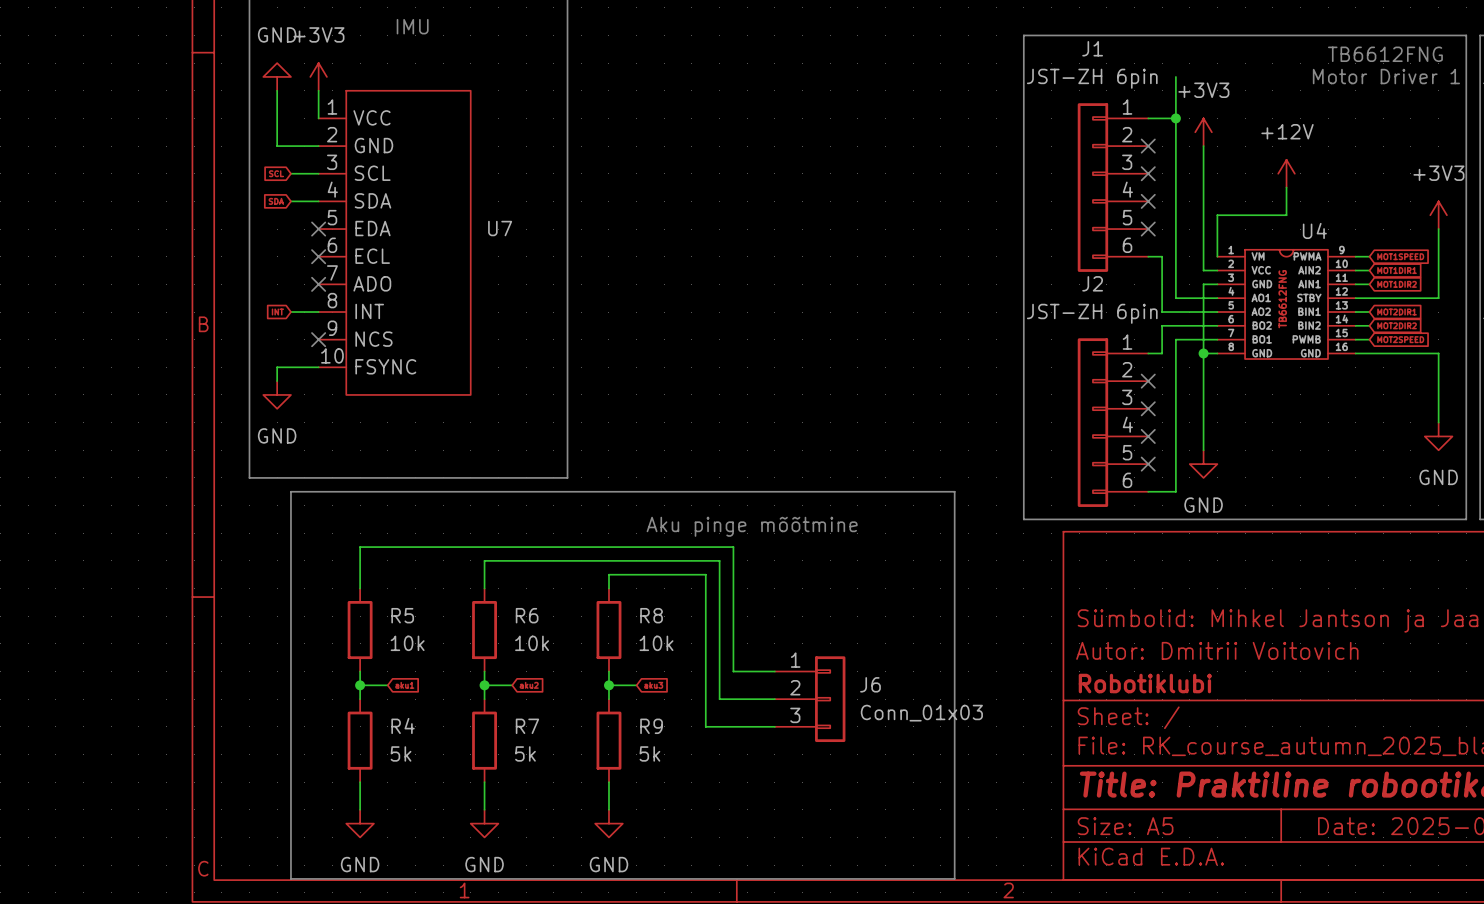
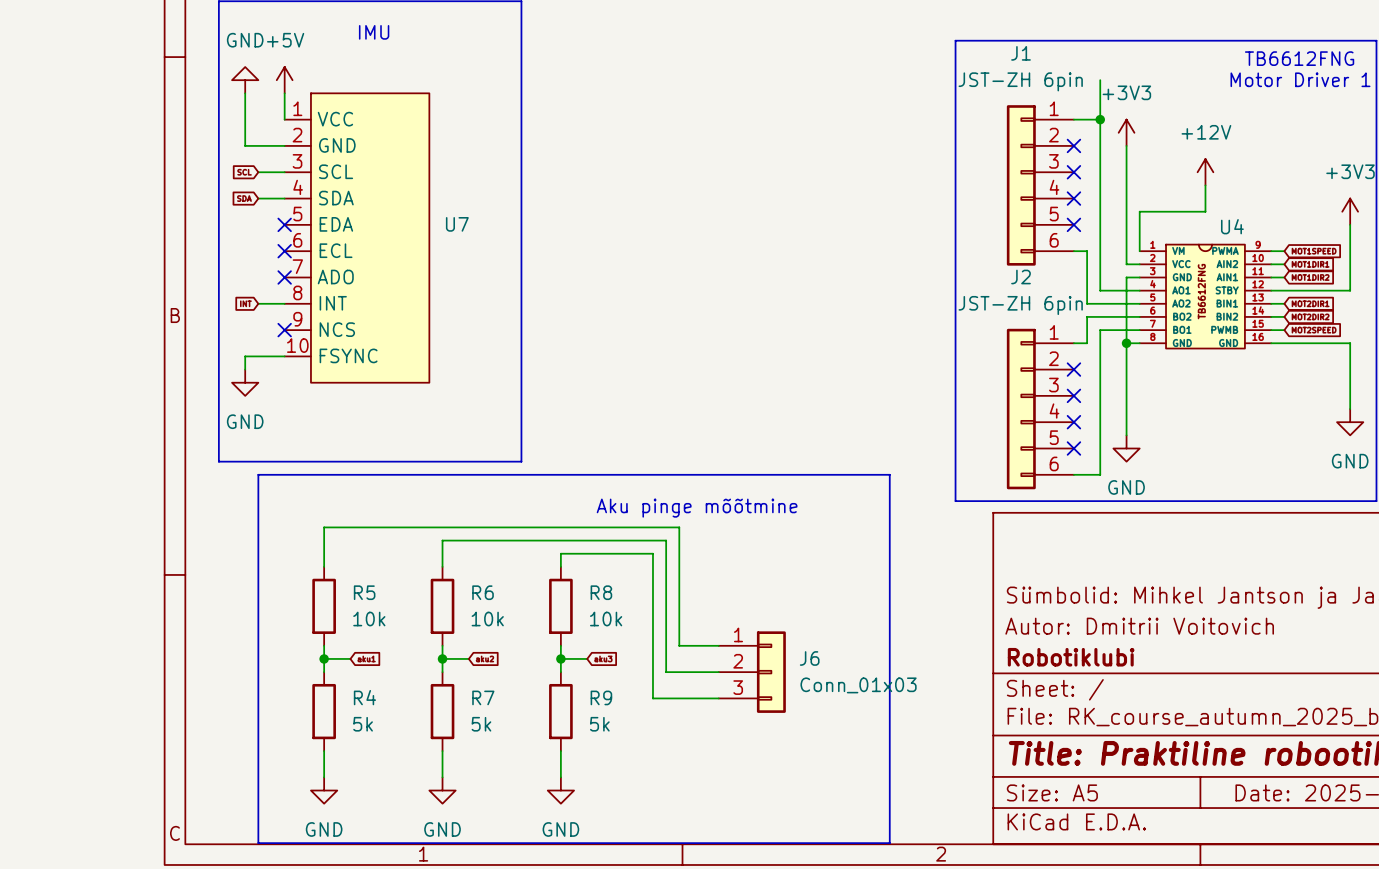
power symbol: +3V3 (318, 76) -> +5V (284, 80)

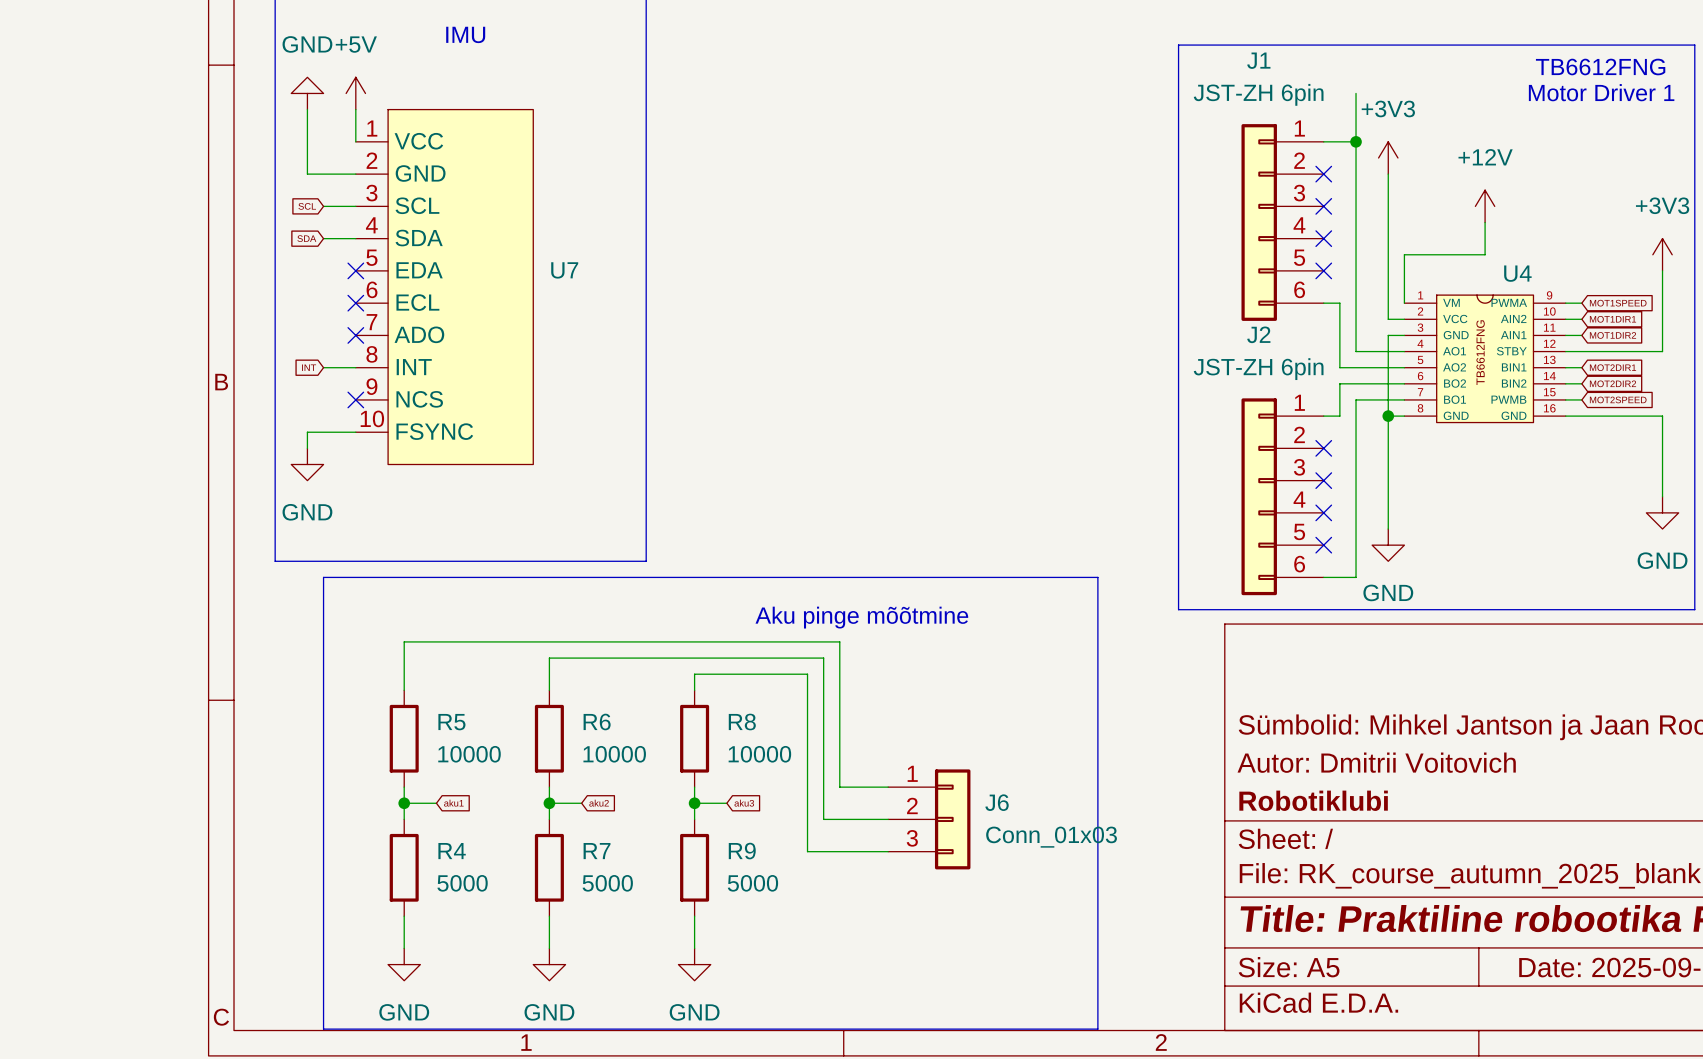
R5 value: 10k (369, 619) -> 10000 (469, 754)
R6 value: 10k (487, 619) -> 10000 (614, 754)
R8 value: 10k (606, 619) -> 10000 (759, 754)
R4 value: 5k (363, 724) -> 5000 (462, 883)
R7 value: 5k (481, 724) -> 5000 (607, 883)
R9 value: 5k (599, 724) -> 5000 (752, 883)

